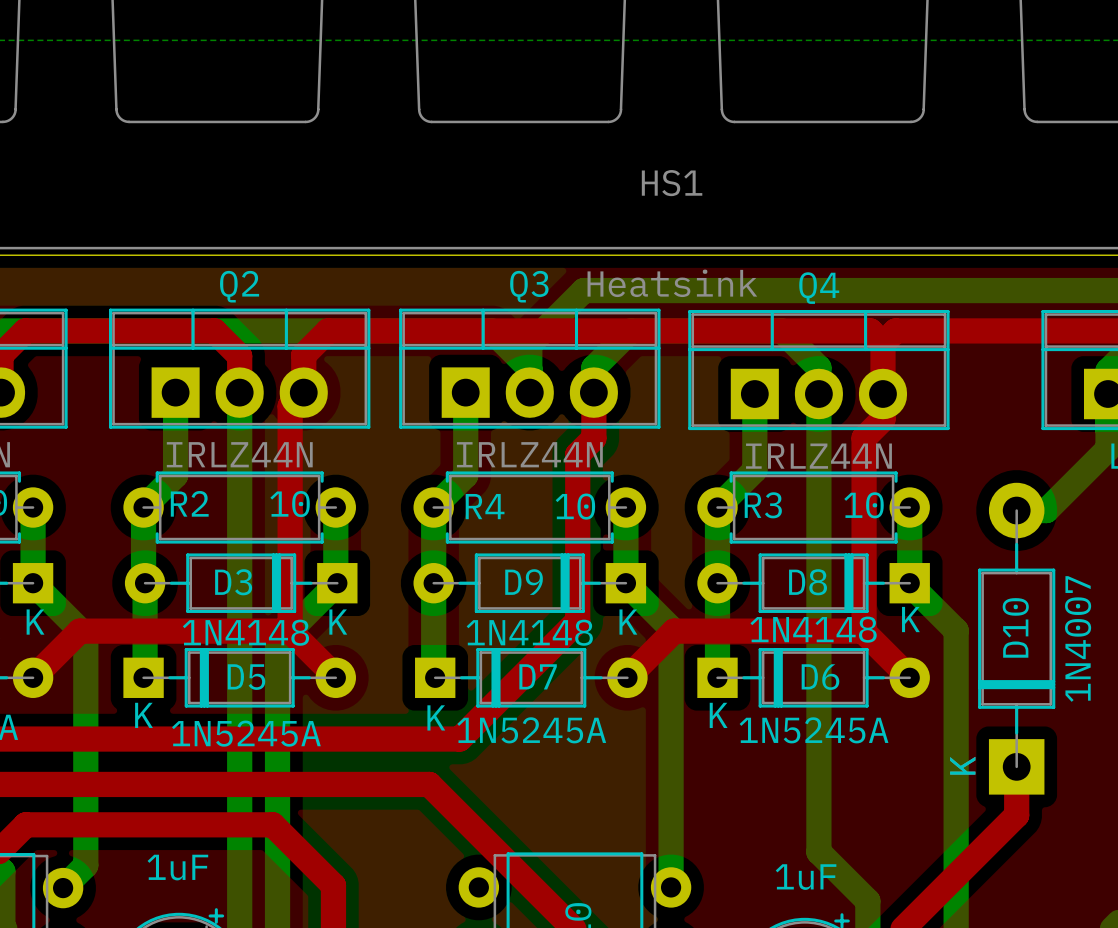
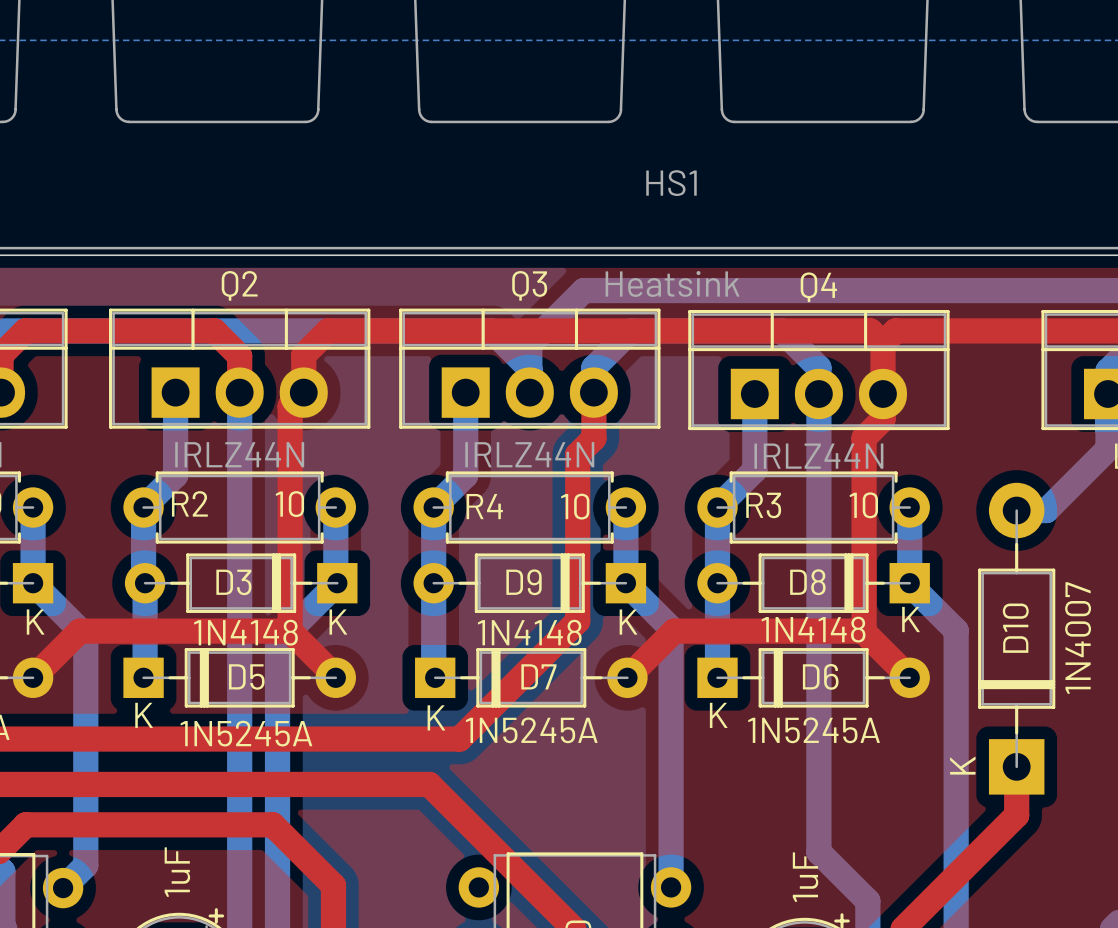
part value rotation: 0° (177, 867) -> 90° counterclockwise (177, 872)
part value rotation: 0° (806, 877) -> 90° counterclockwise (805, 877)

